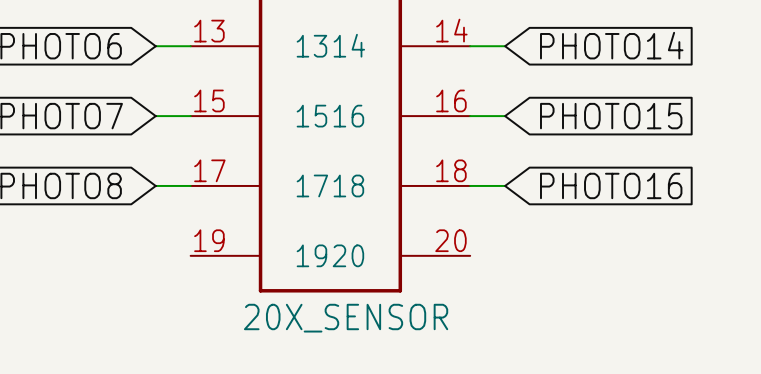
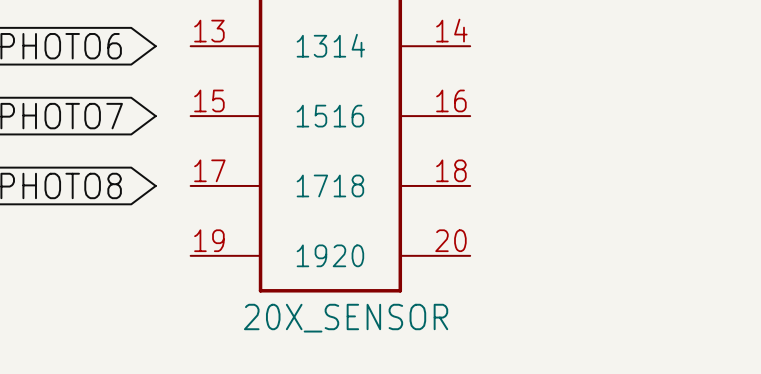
global label: PHOTO14 (611, 45) -> none
wire: (155, 46) (190, 46) -> none
wire: (470, 46) (505, 46) -> none
wire: (155, 116) (190, 116) -> none
wire: (470, 116) (505, 116) -> none
global label: PHOTO15 (611, 116) -> none
wire: (155, 185) (190, 185) -> none
wire: (470, 185) (505, 185) -> none
global label: PHOTO16 (611, 185) -> none

